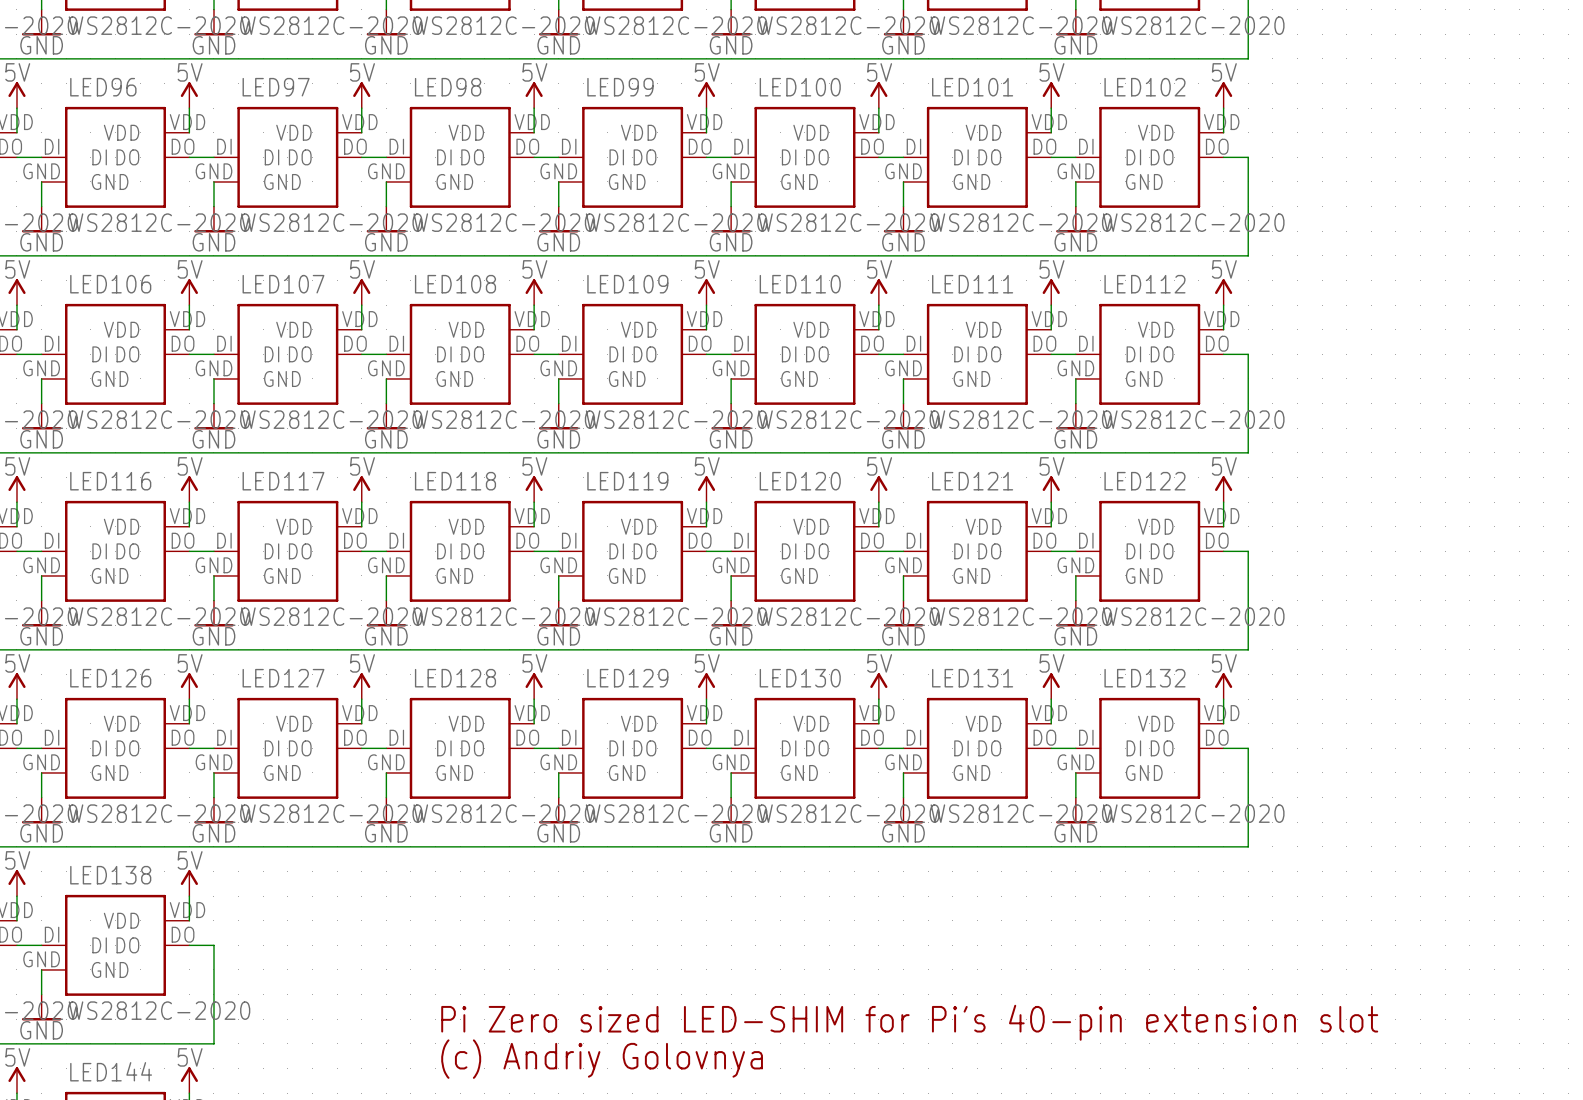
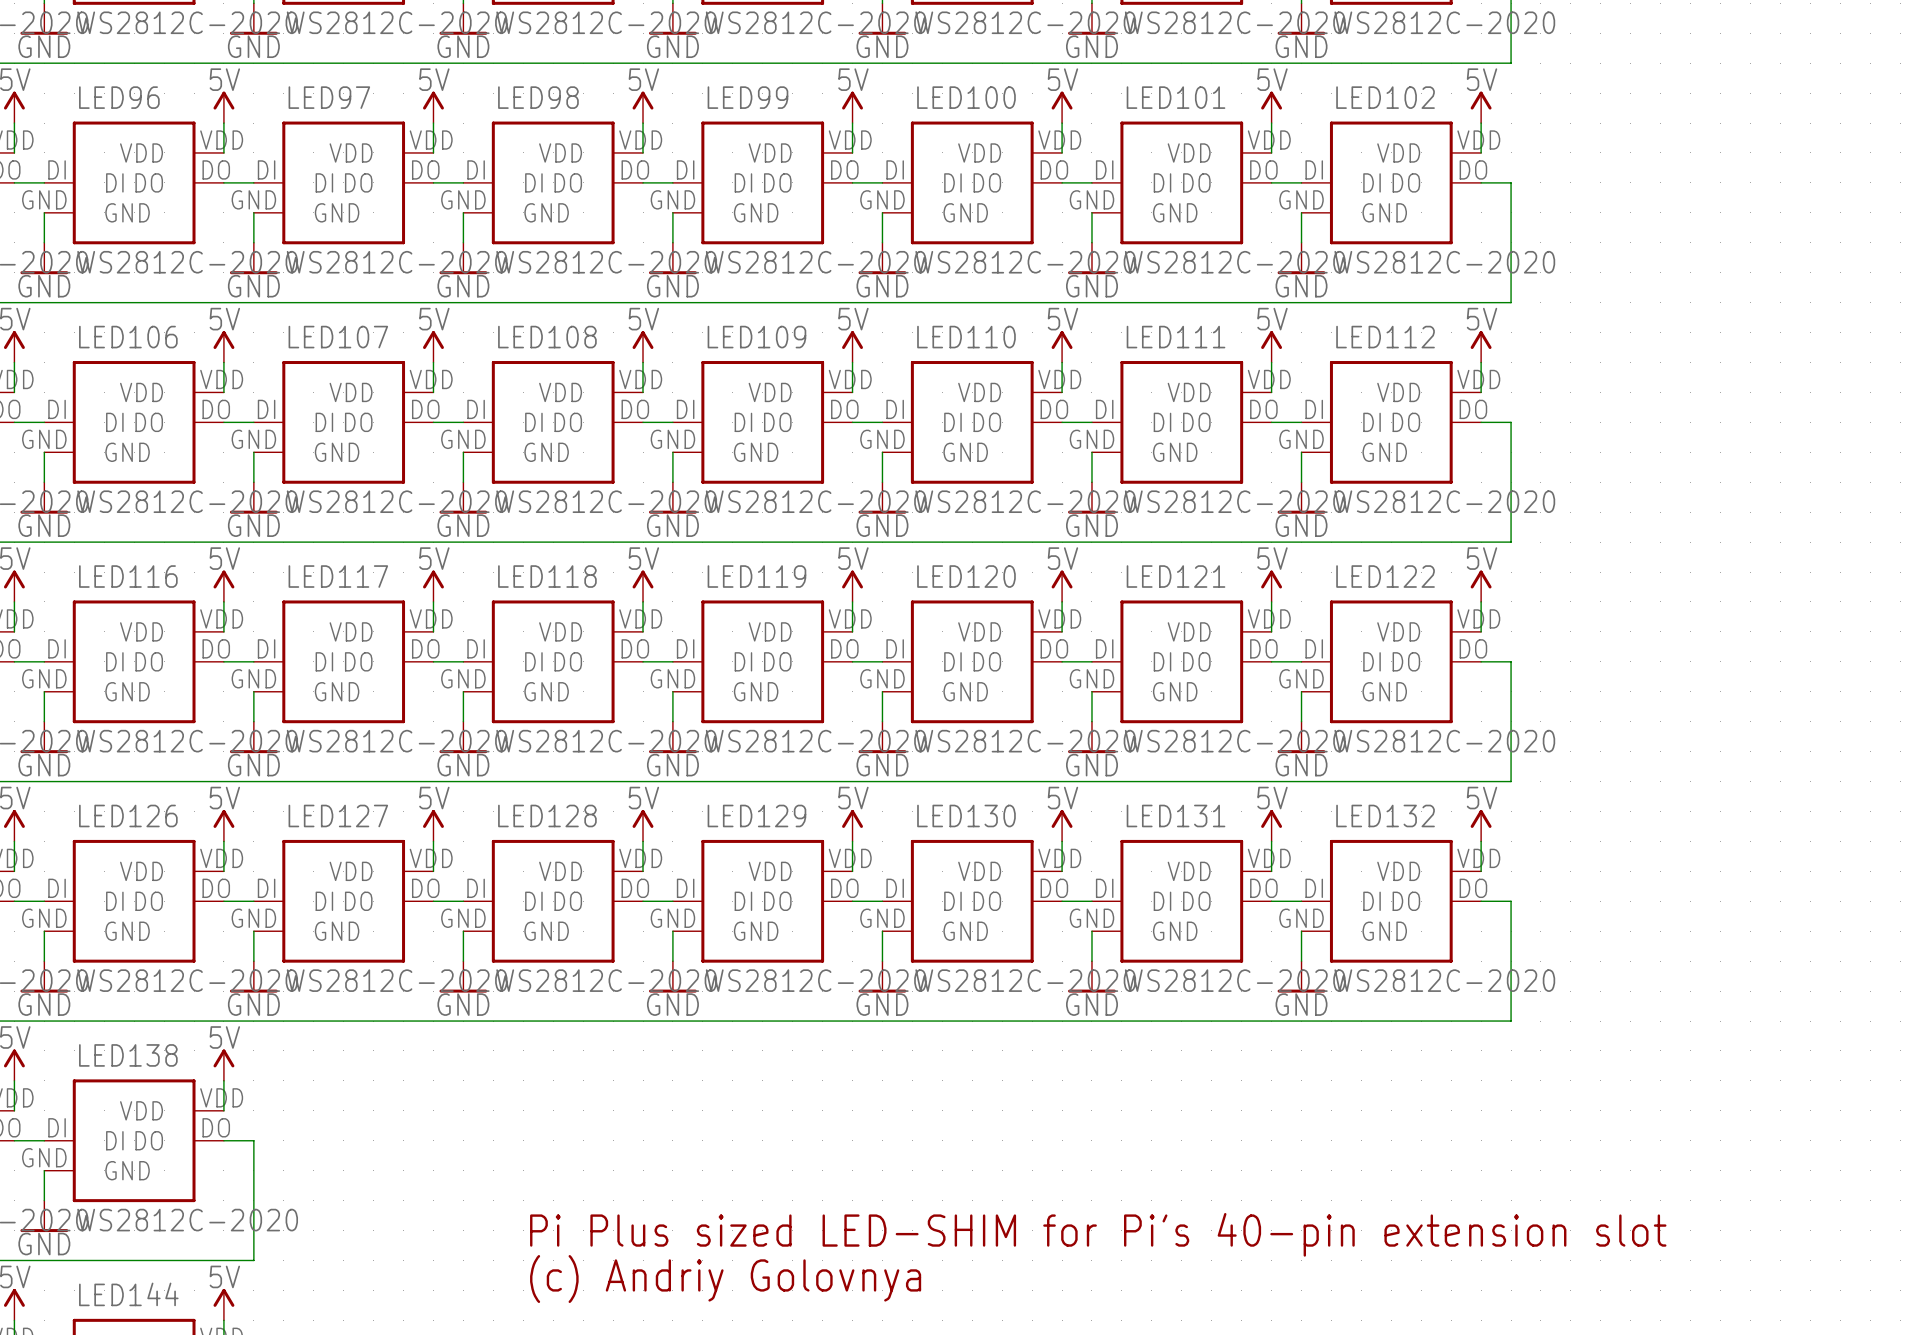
text: Pi Zero sized LED-SHIM for Pi's 40-pin extension slot (909, 1022) -> Pi Plus sized LED-SHIM for Pi's 40-pin extension slot (1098, 1234)

